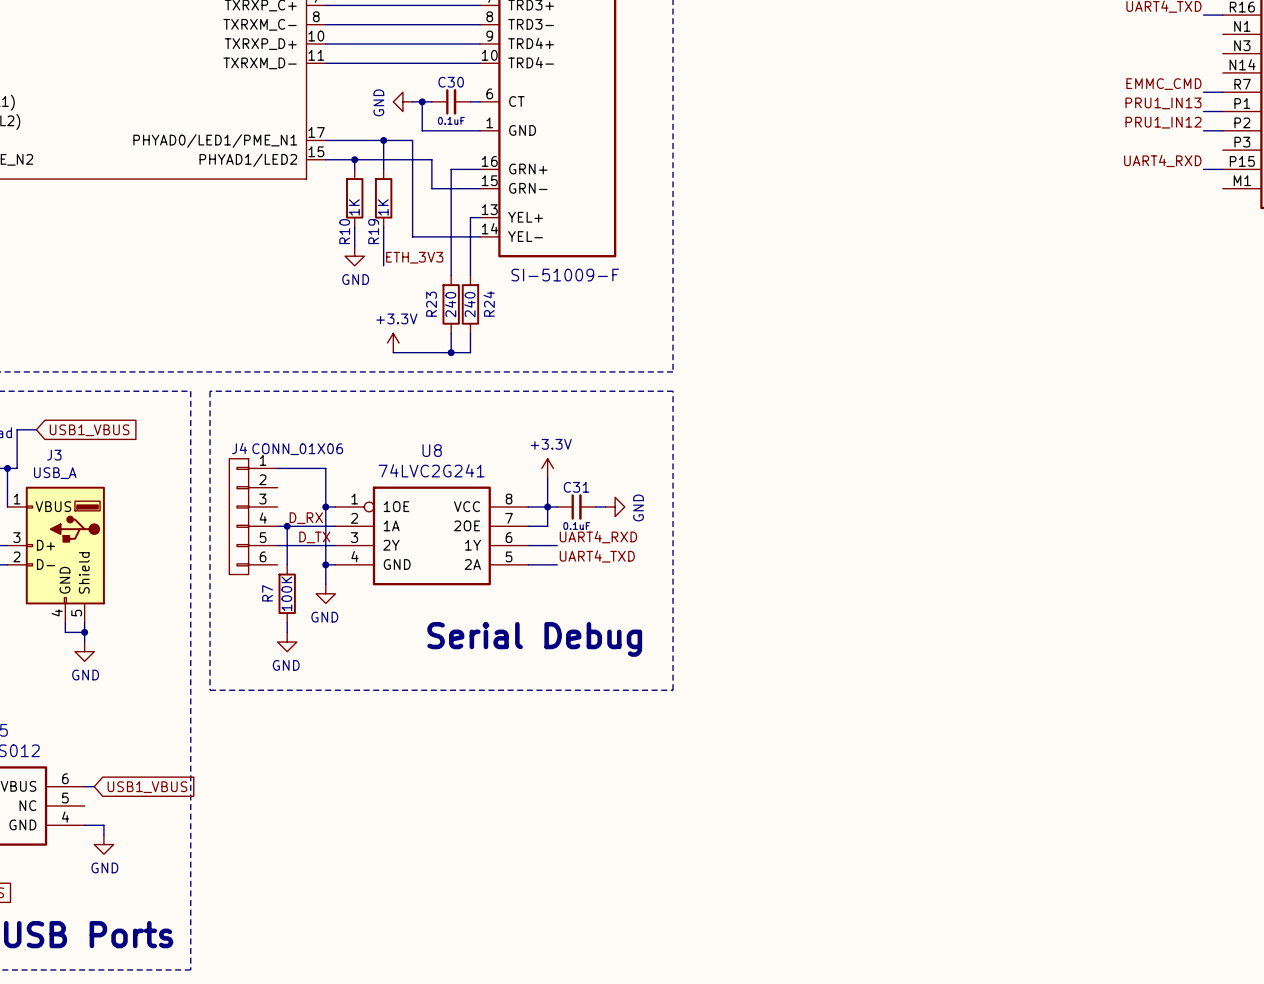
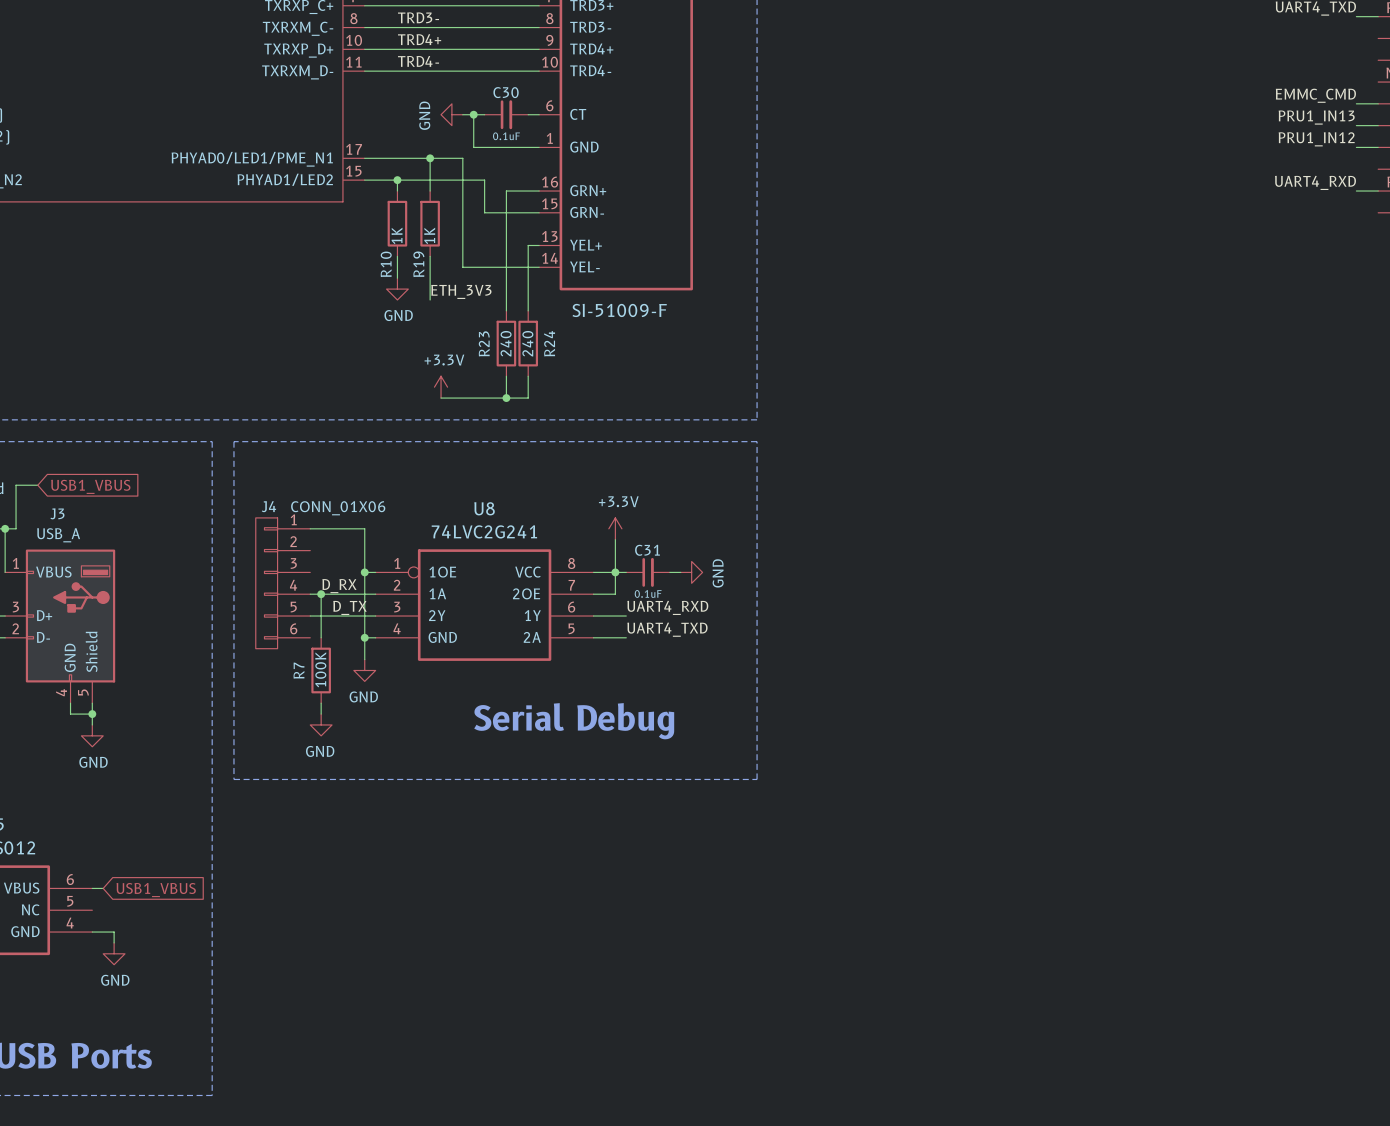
label: none -> TRD3- (418, 17)
label: none -> TRD4+ (419, 39)
label: none -> TRD4- (418, 61)

